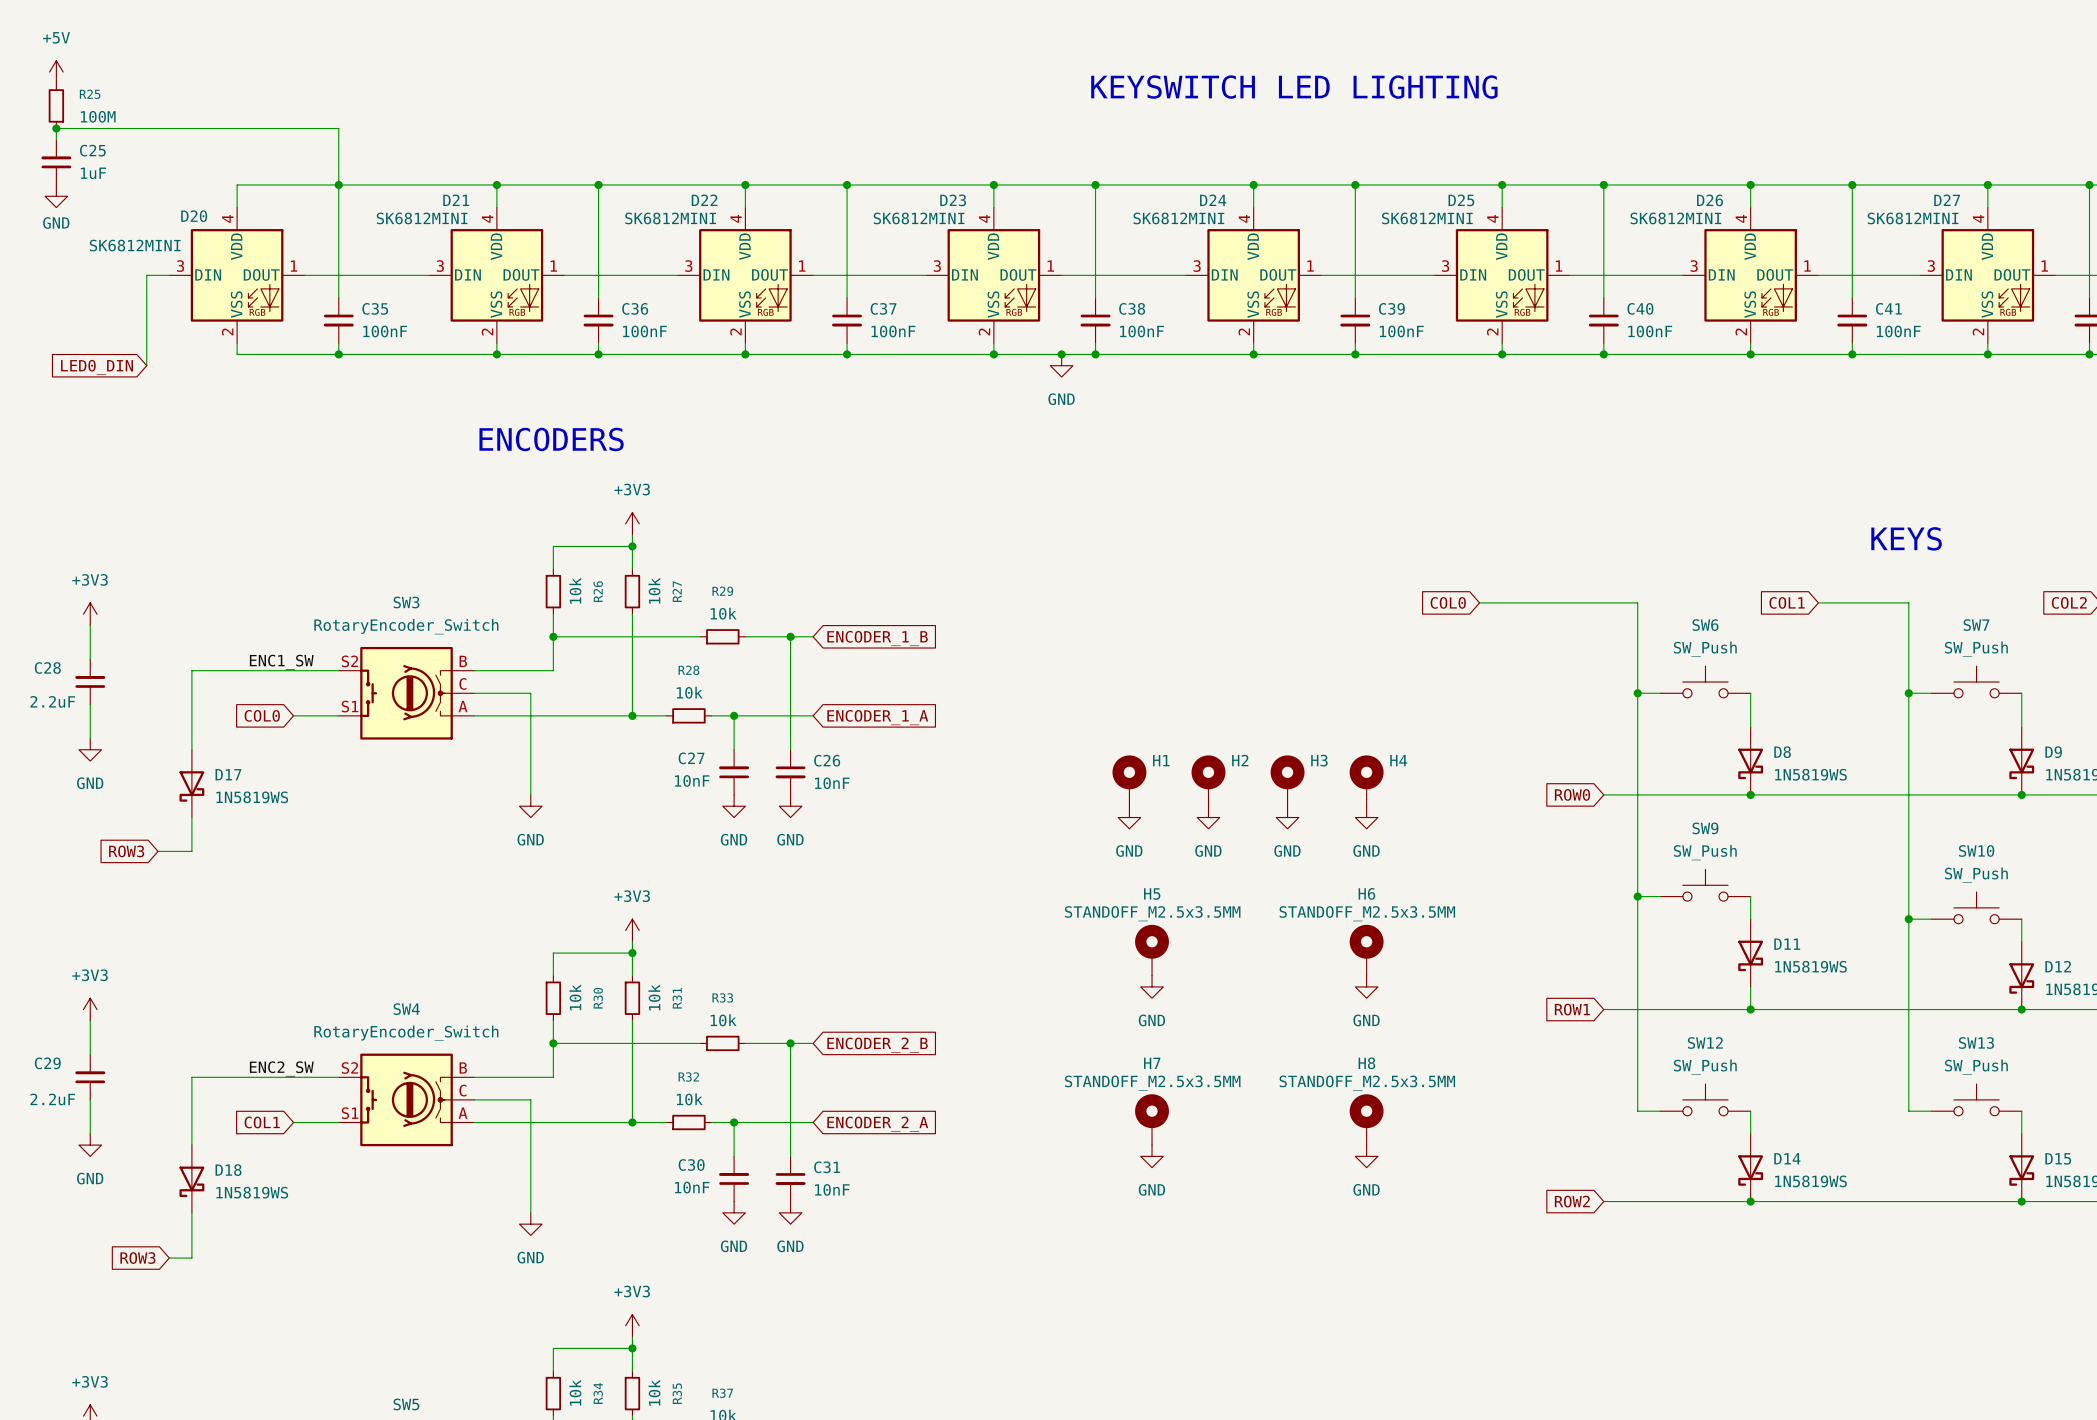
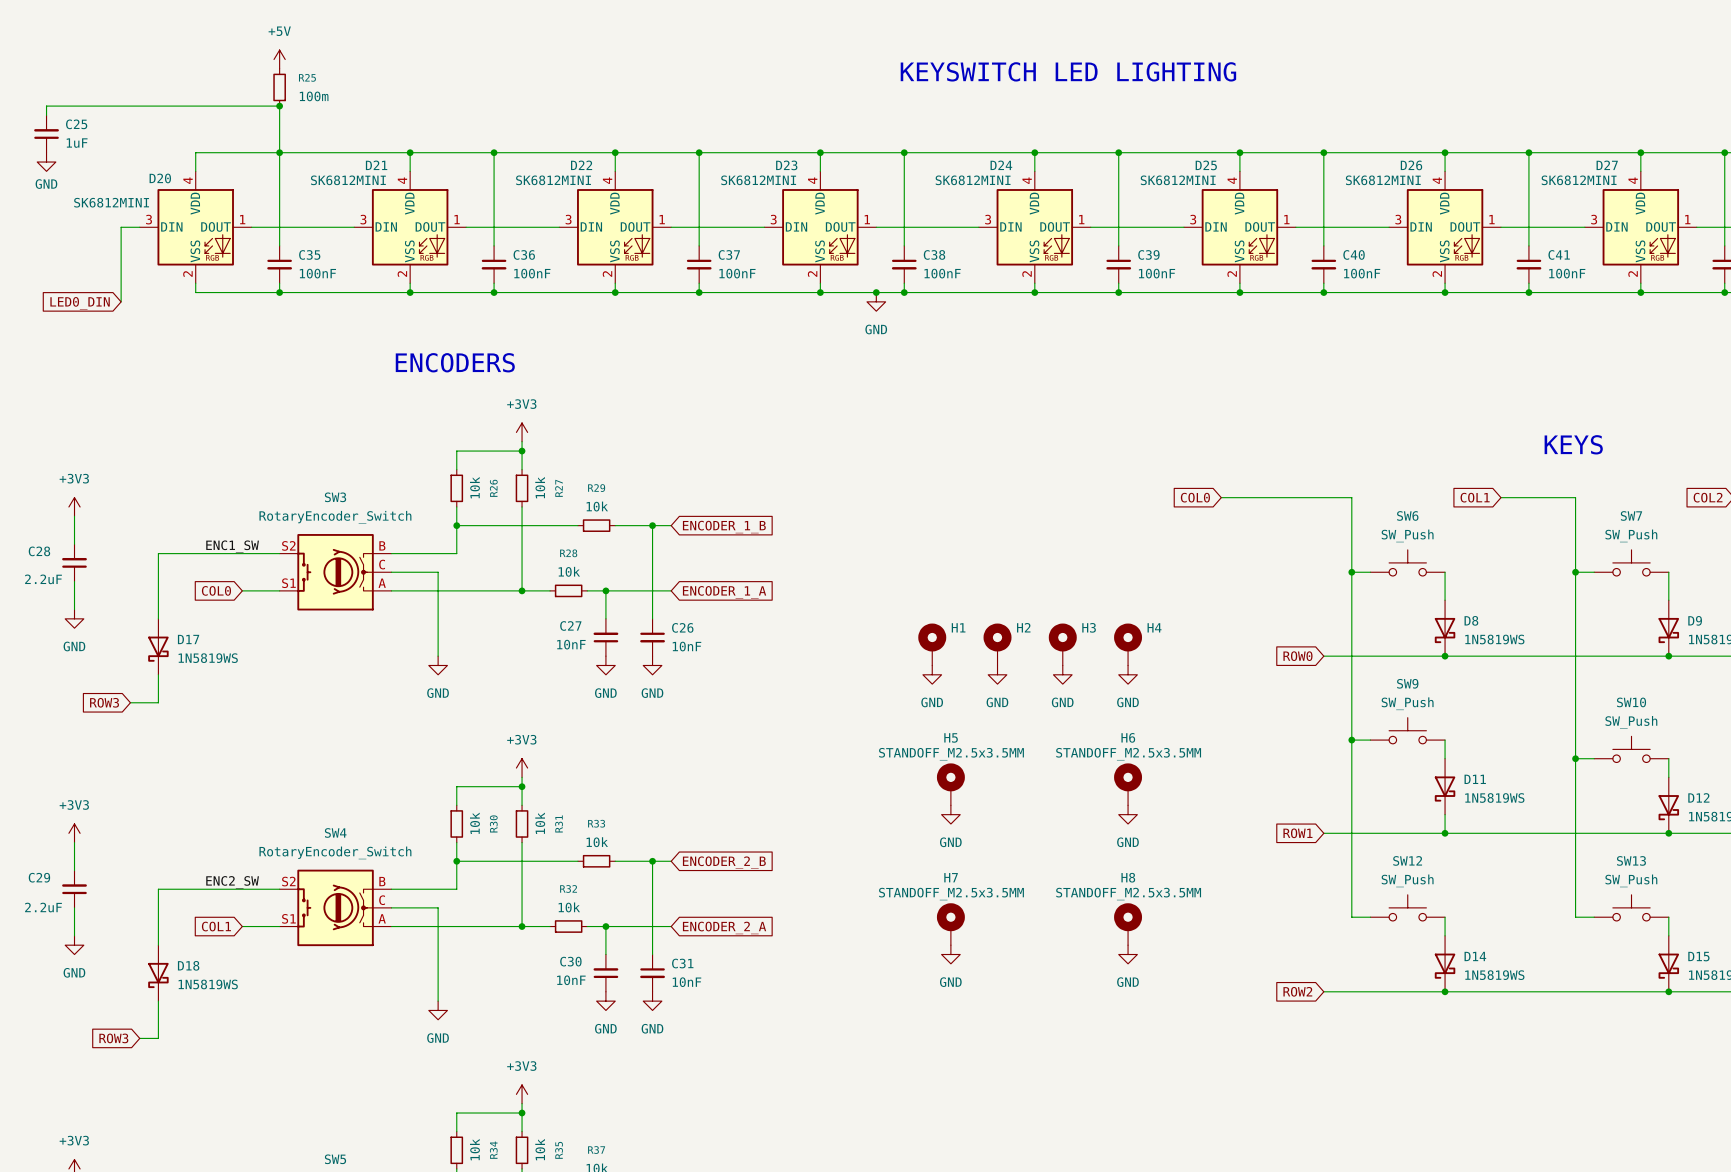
power symbol: +5V (56, 72) -> none
power symbol: none -> +5V (279, 59)
R25 position: (56, 105) -> (279, 87)
R25 value: 100M (98, 116) -> 100m (314, 96)
junction: (56, 128) -> none
junction: none -> (279, 106)

